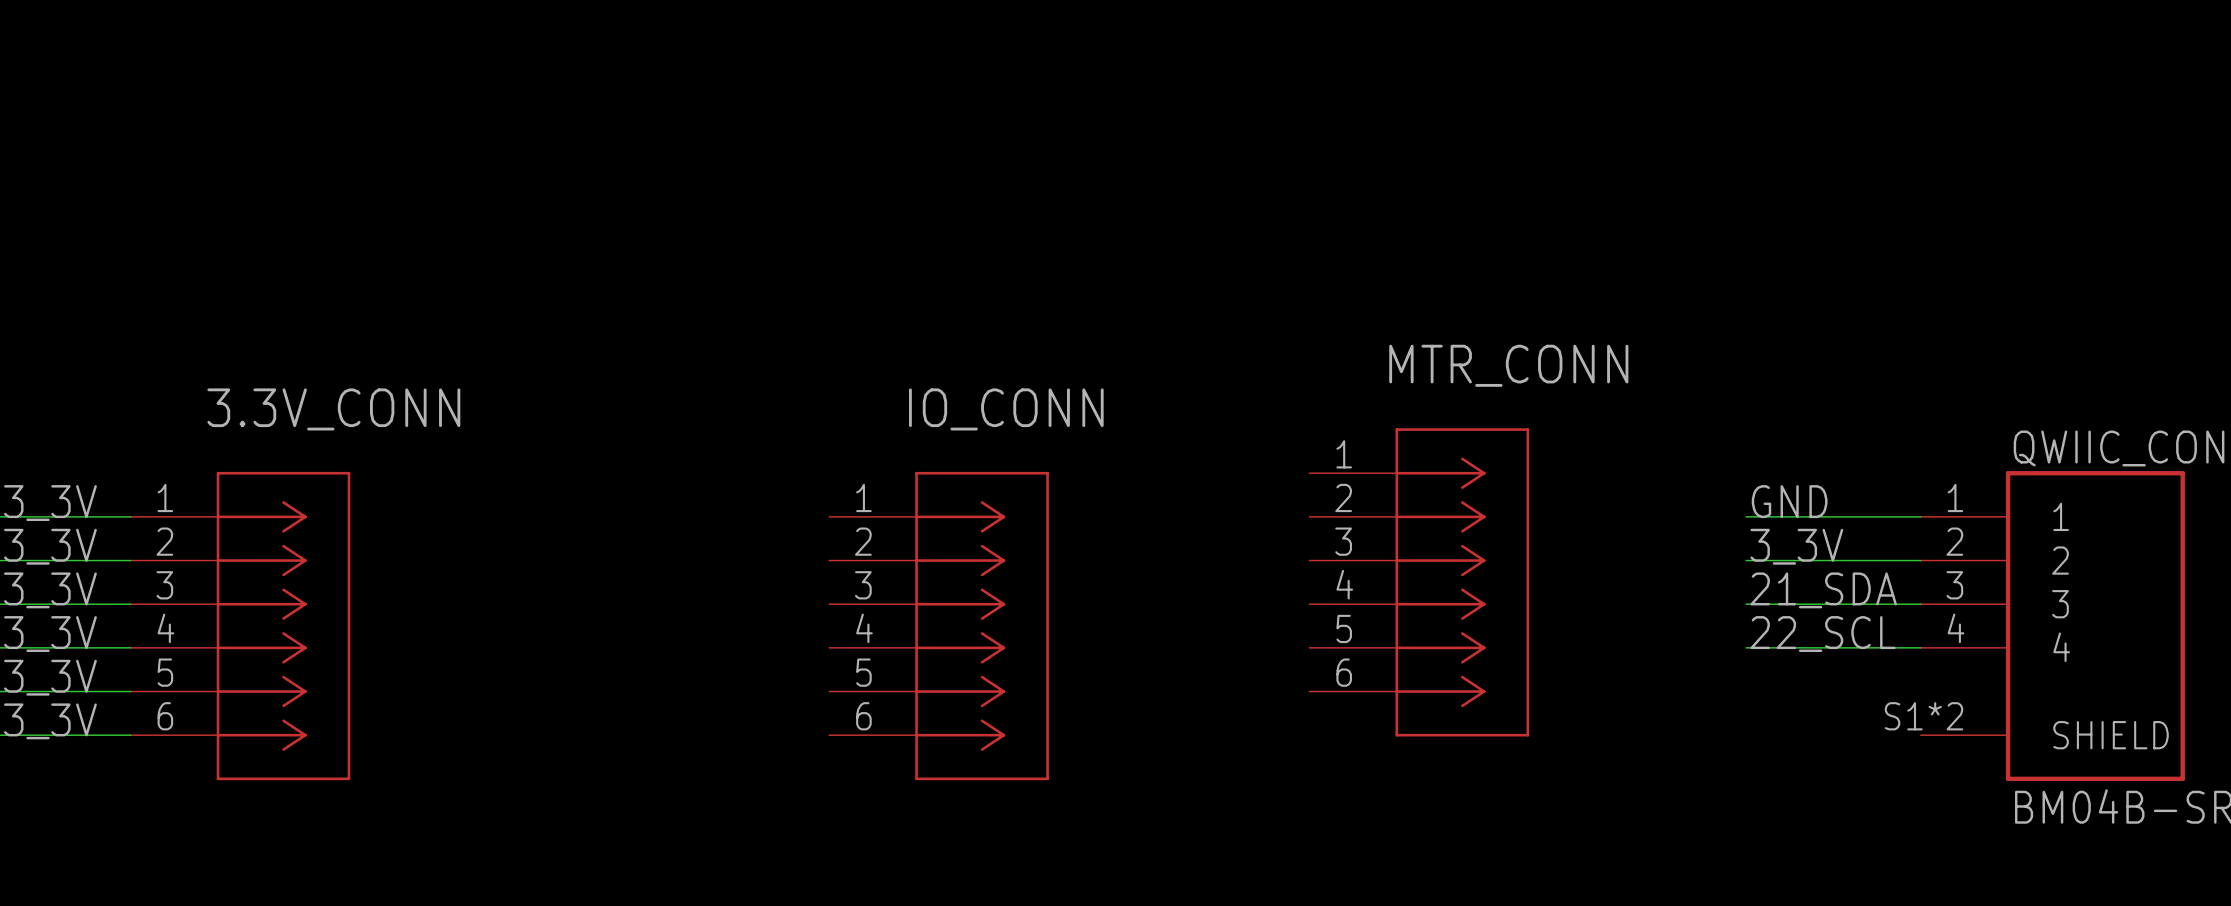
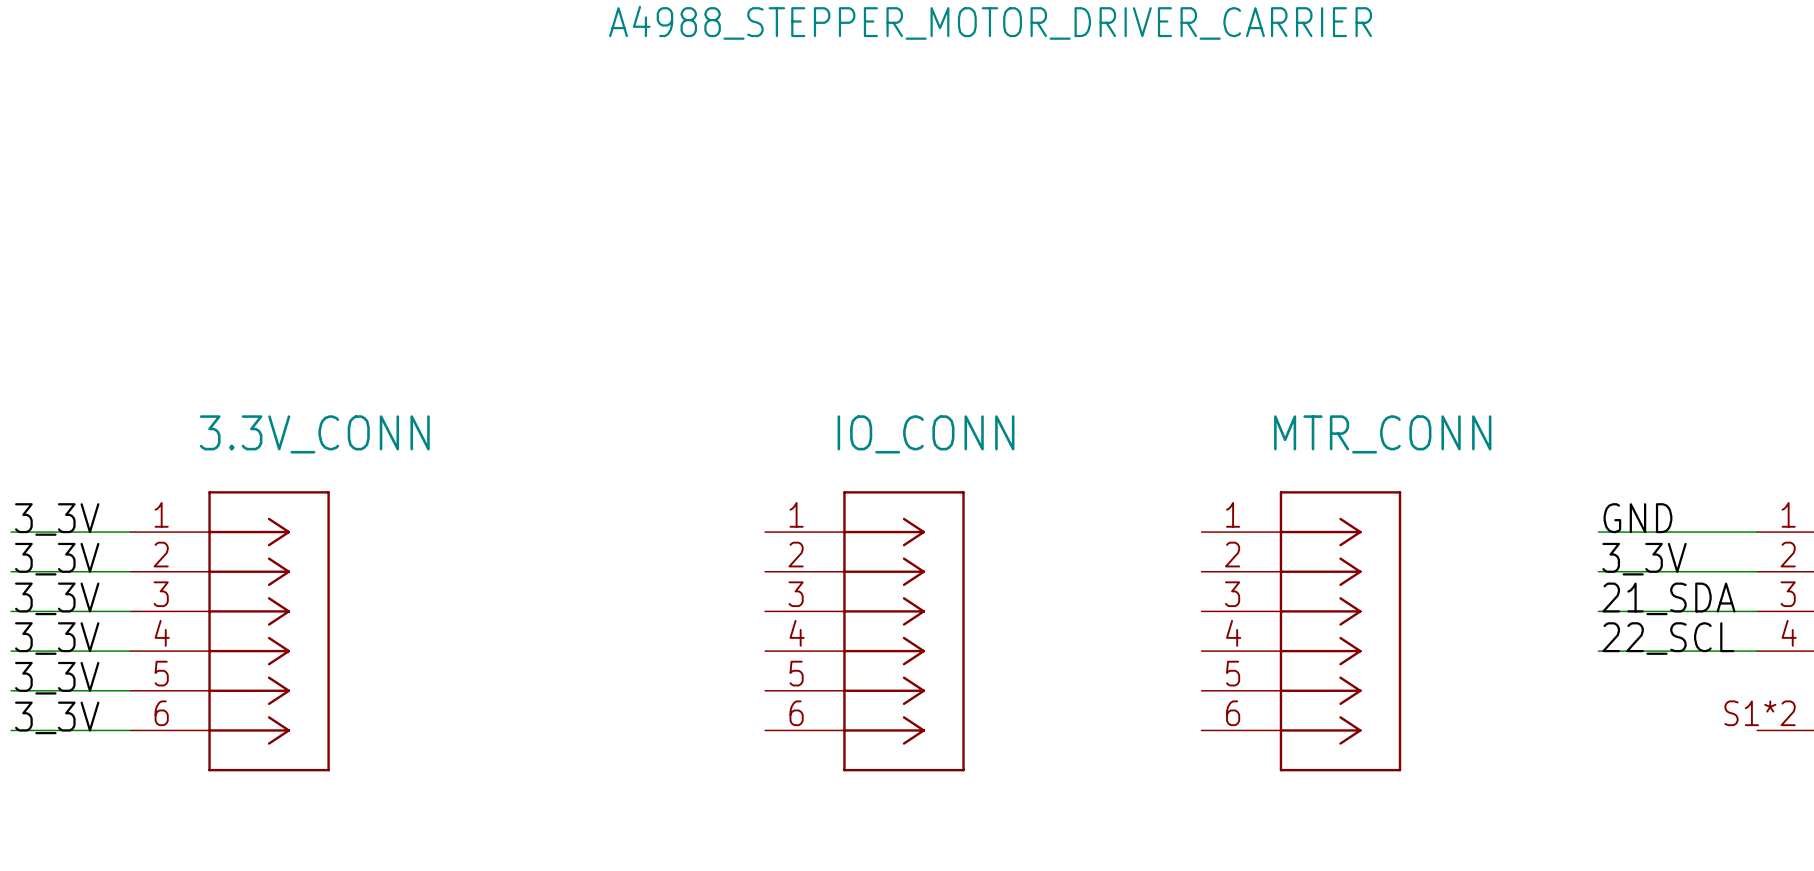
MTR_CONN position: (1419, 582) -> (1301, 631)

